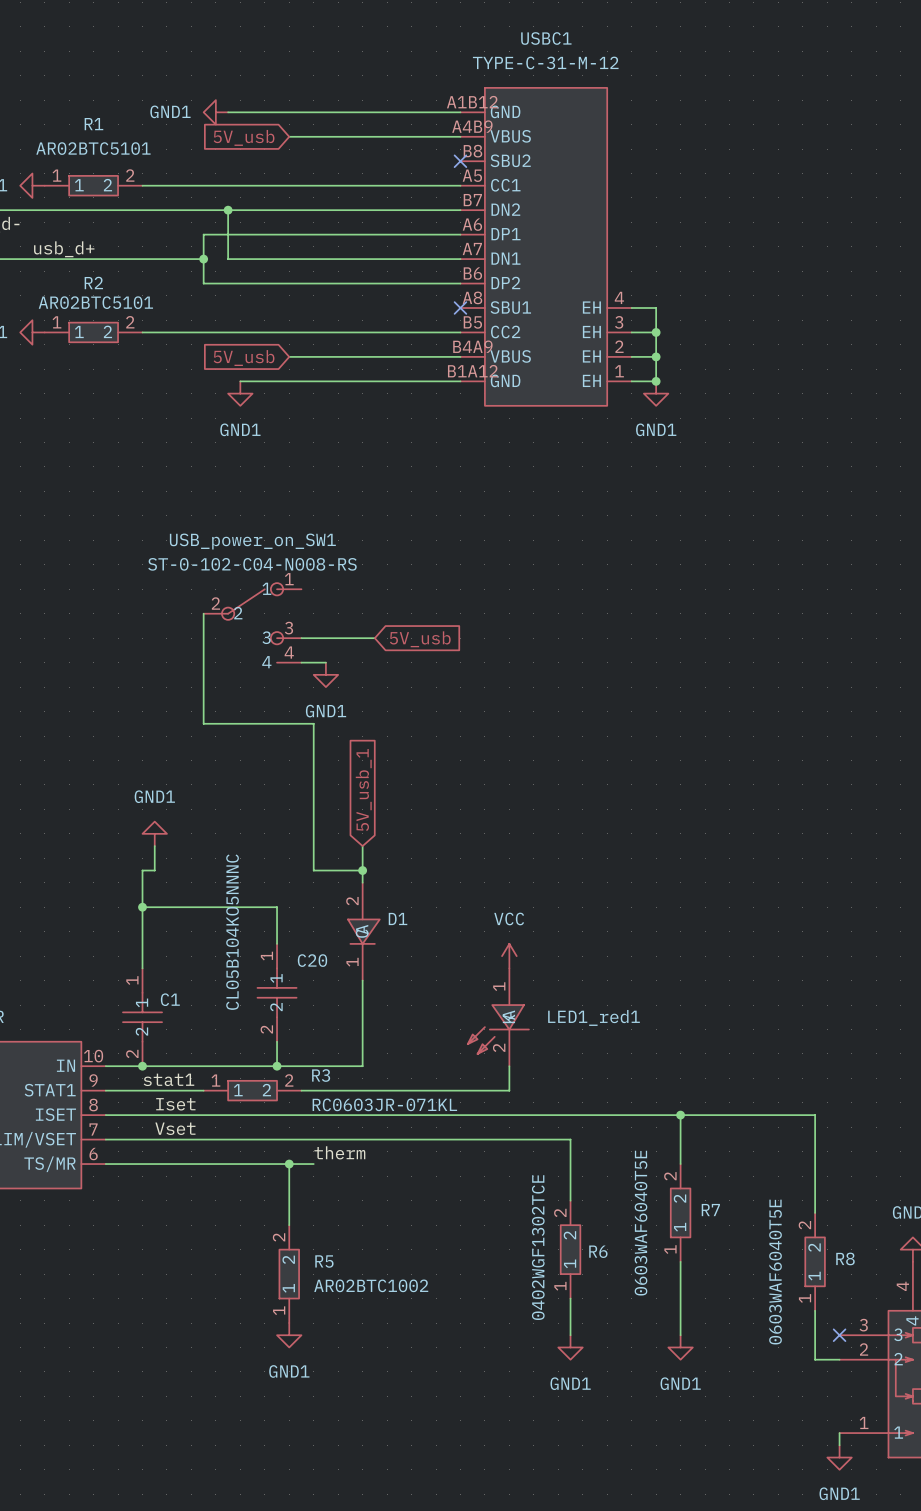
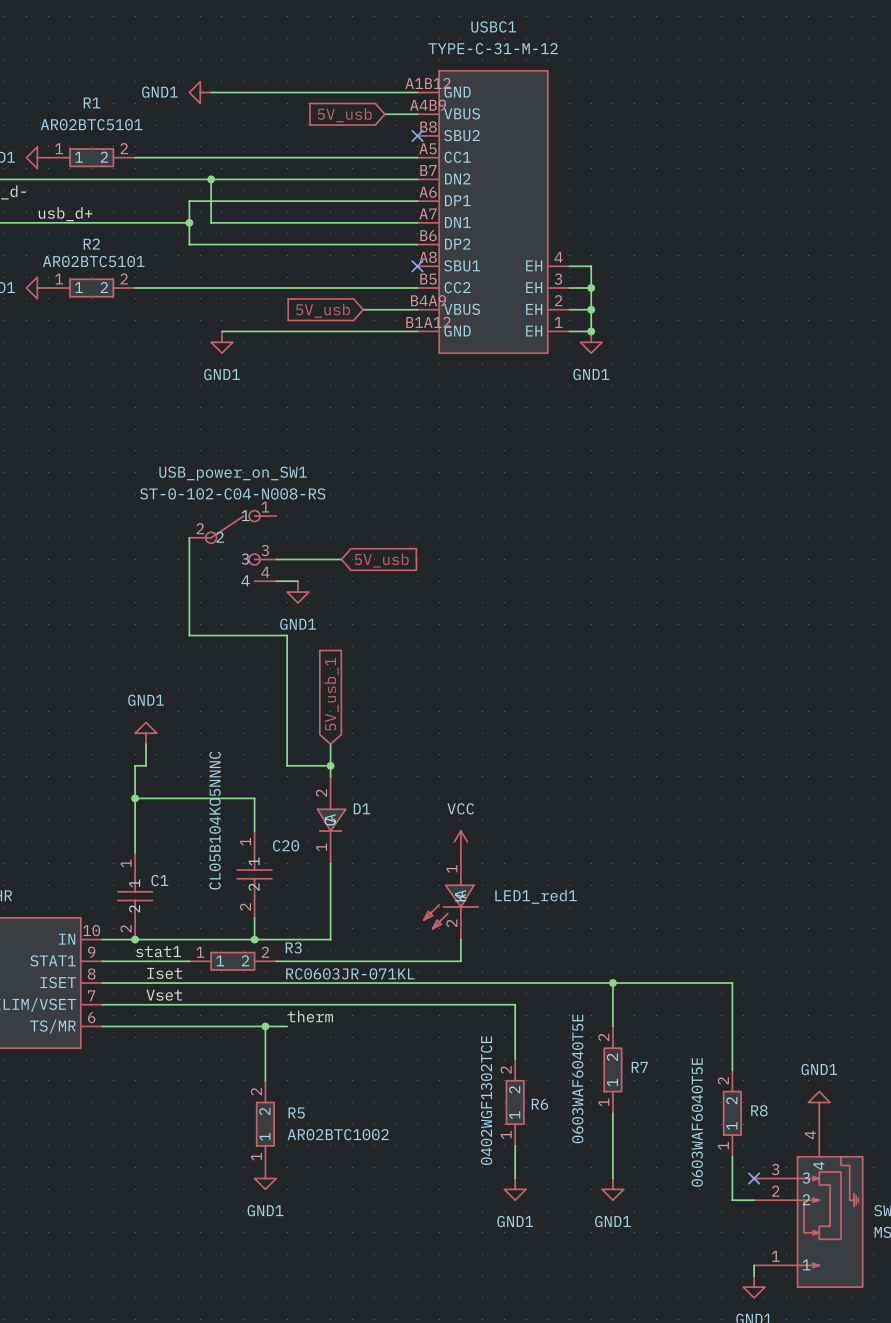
wire: (289, 136) (423, 136) -> none
global label: 5V_usb (244, 137) -> none
global label: none -> 5V_usb (344, 115)
wire: (289, 356) (399, 356) -> none
global label position: 5V_usb (244, 358) -> 5V_usb (323, 310)

